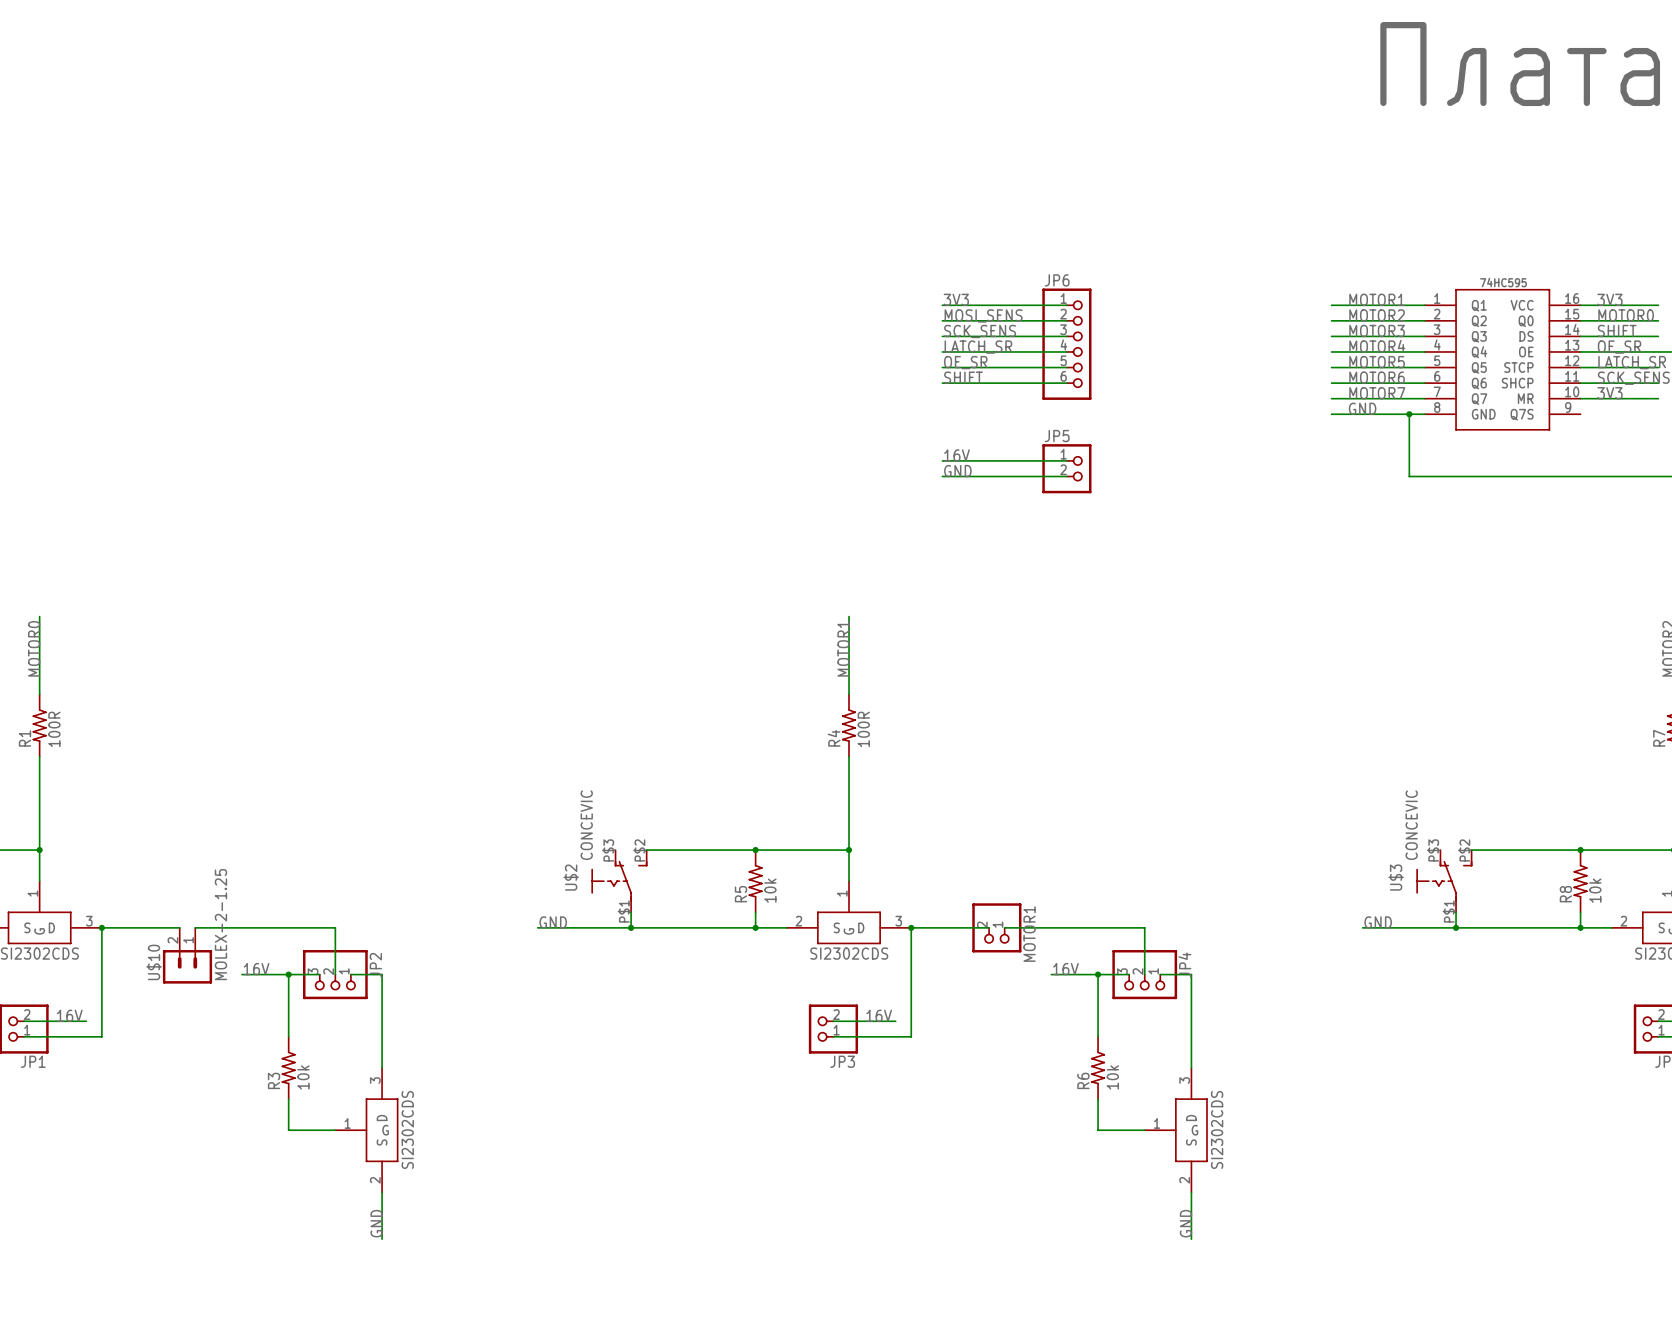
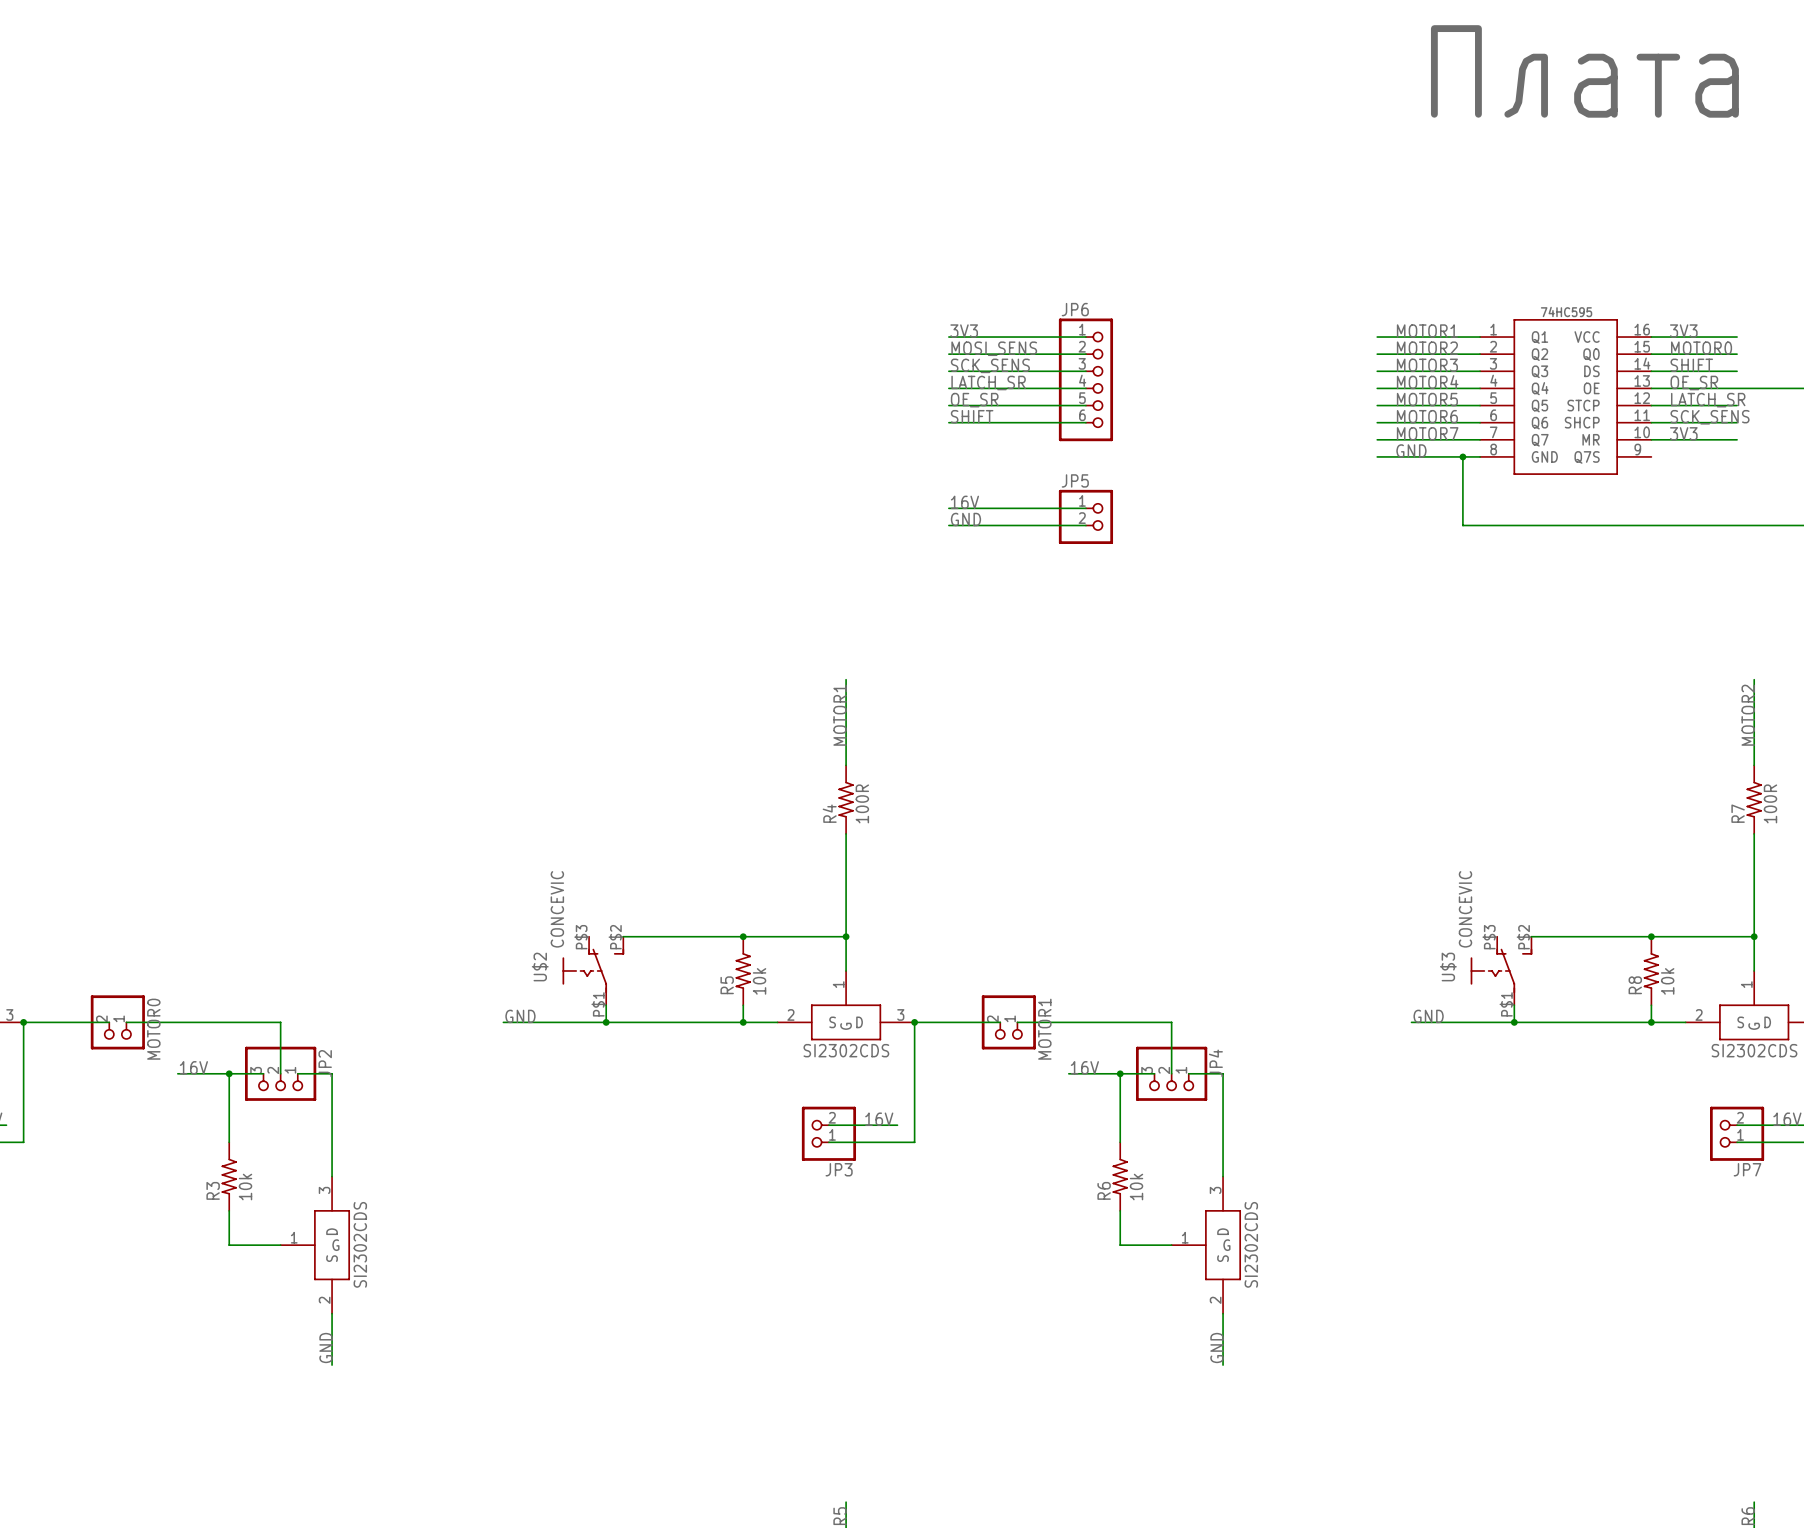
MOTOR0: none -> (117, 1022)
U$10: MOLEX-2-1.25 (187, 955) -> none

